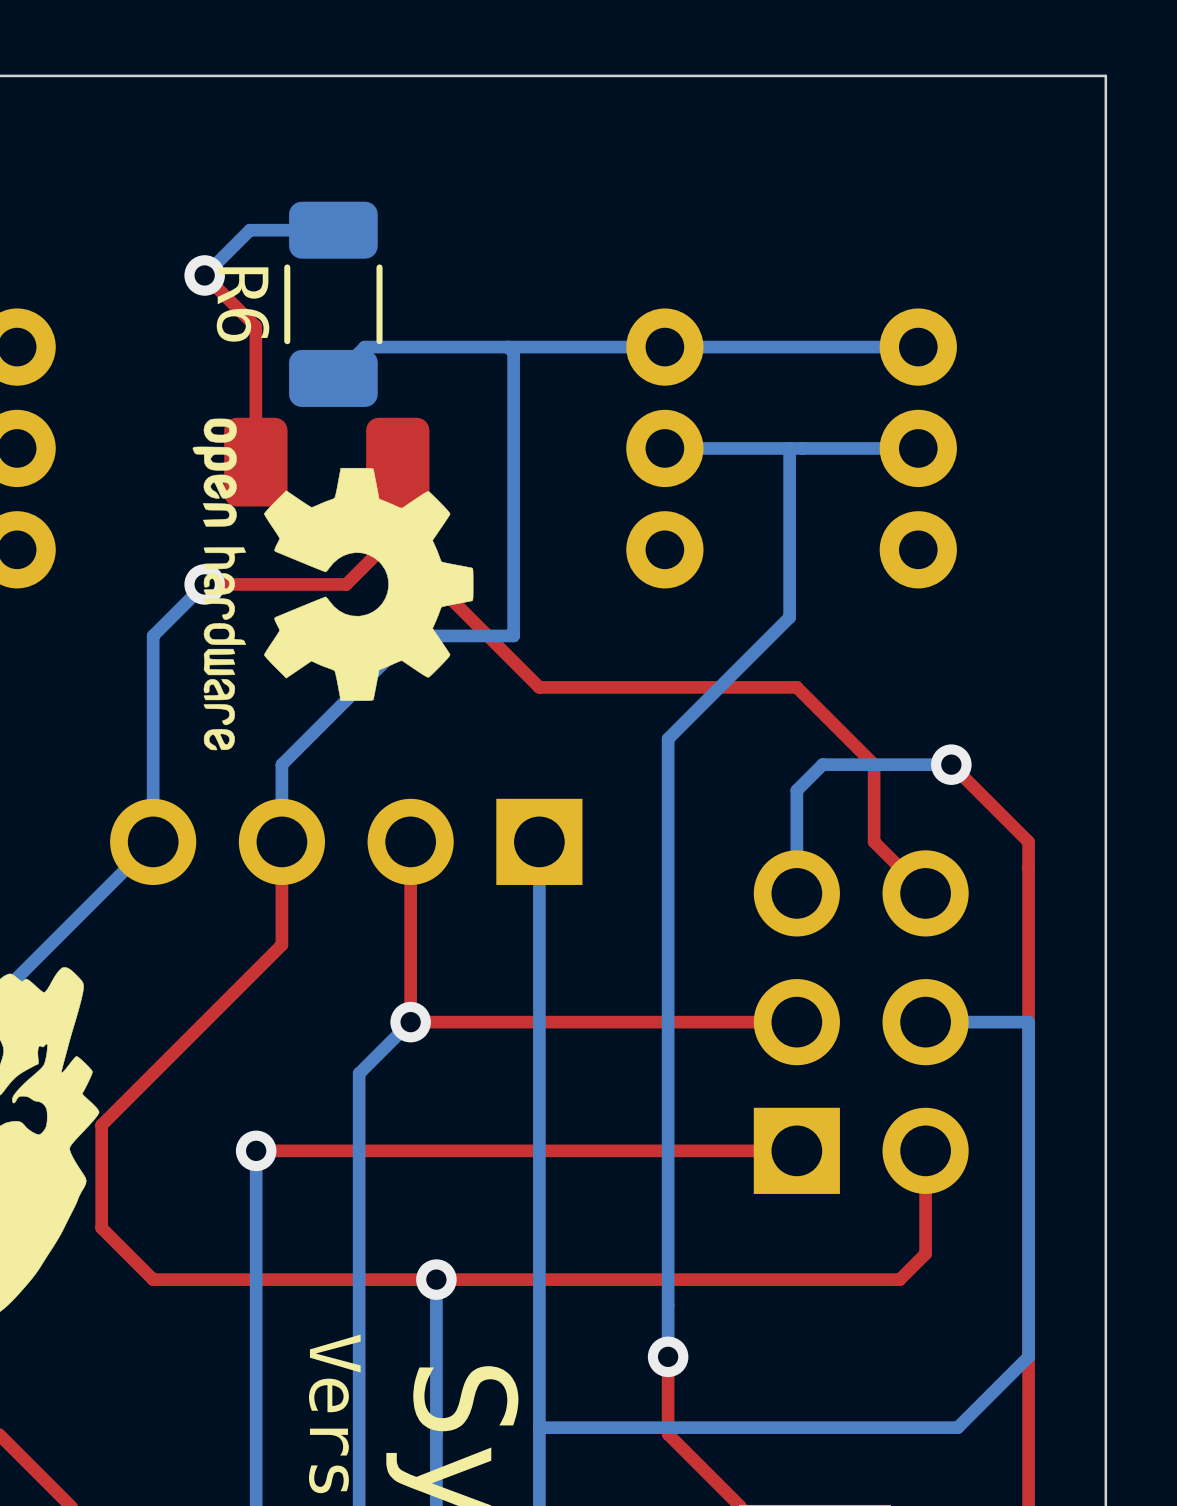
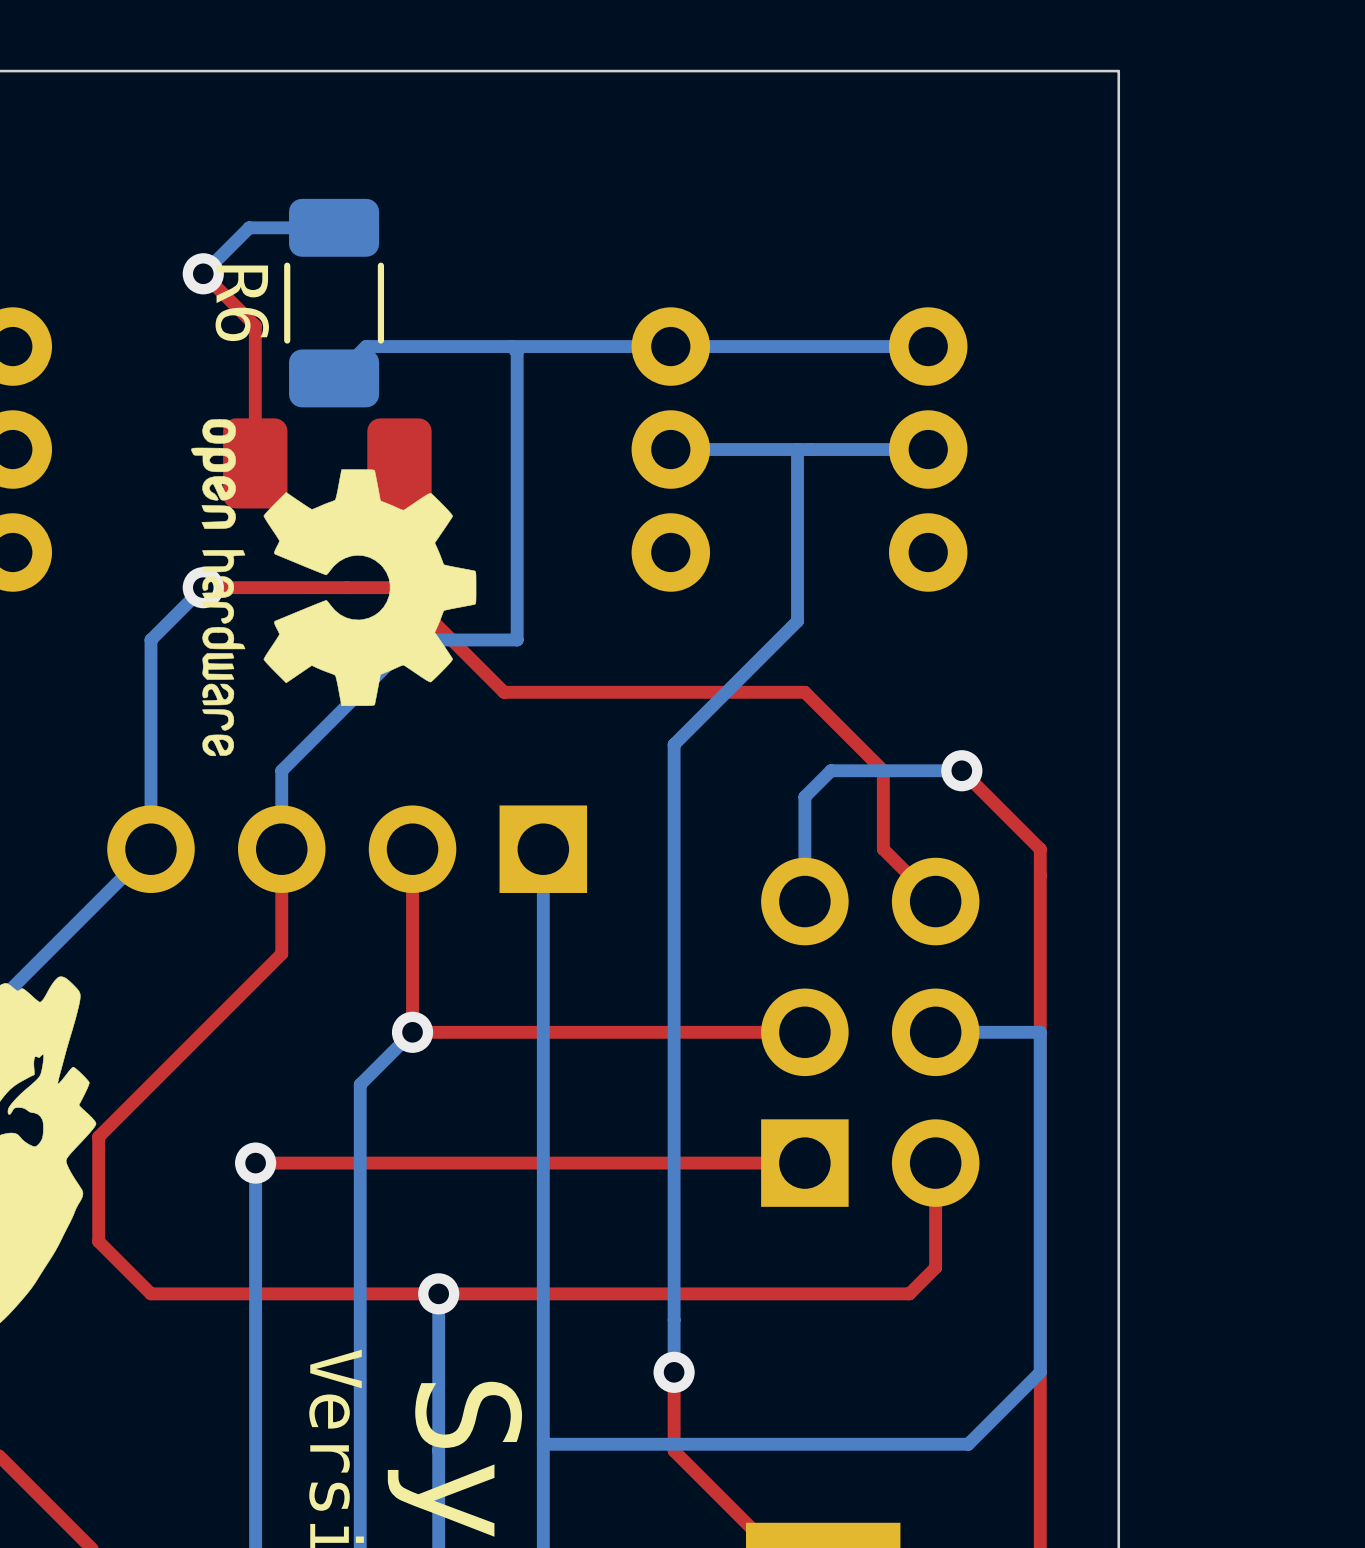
top track: (397, 532) (346, 584) -> (399, 587) (347, 587)
top track: (397, 545) (539, 687) -> (399, 587) (504, 692) (543, 692)

